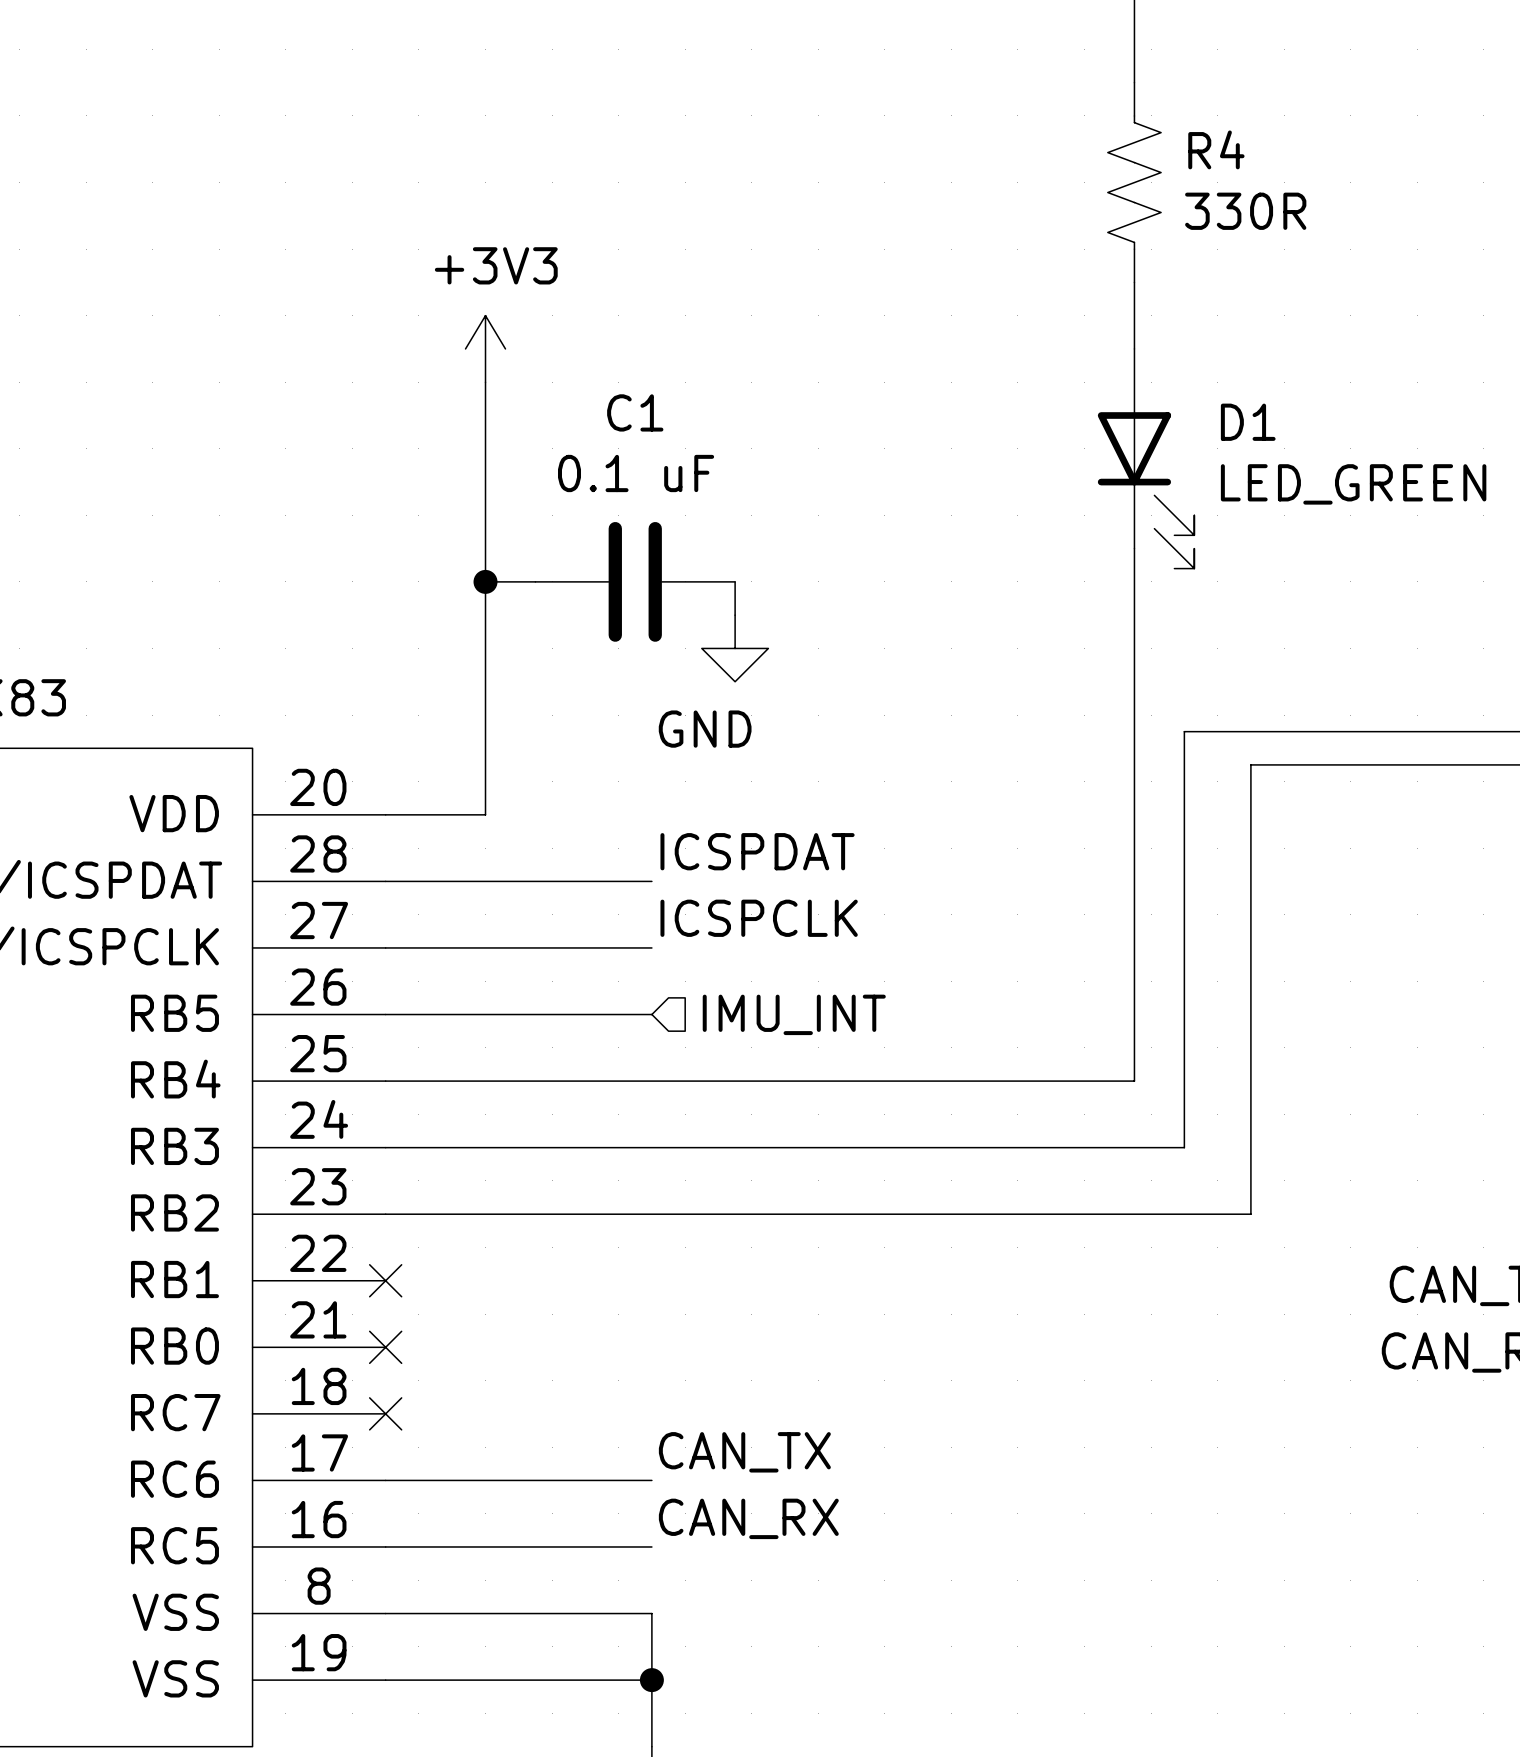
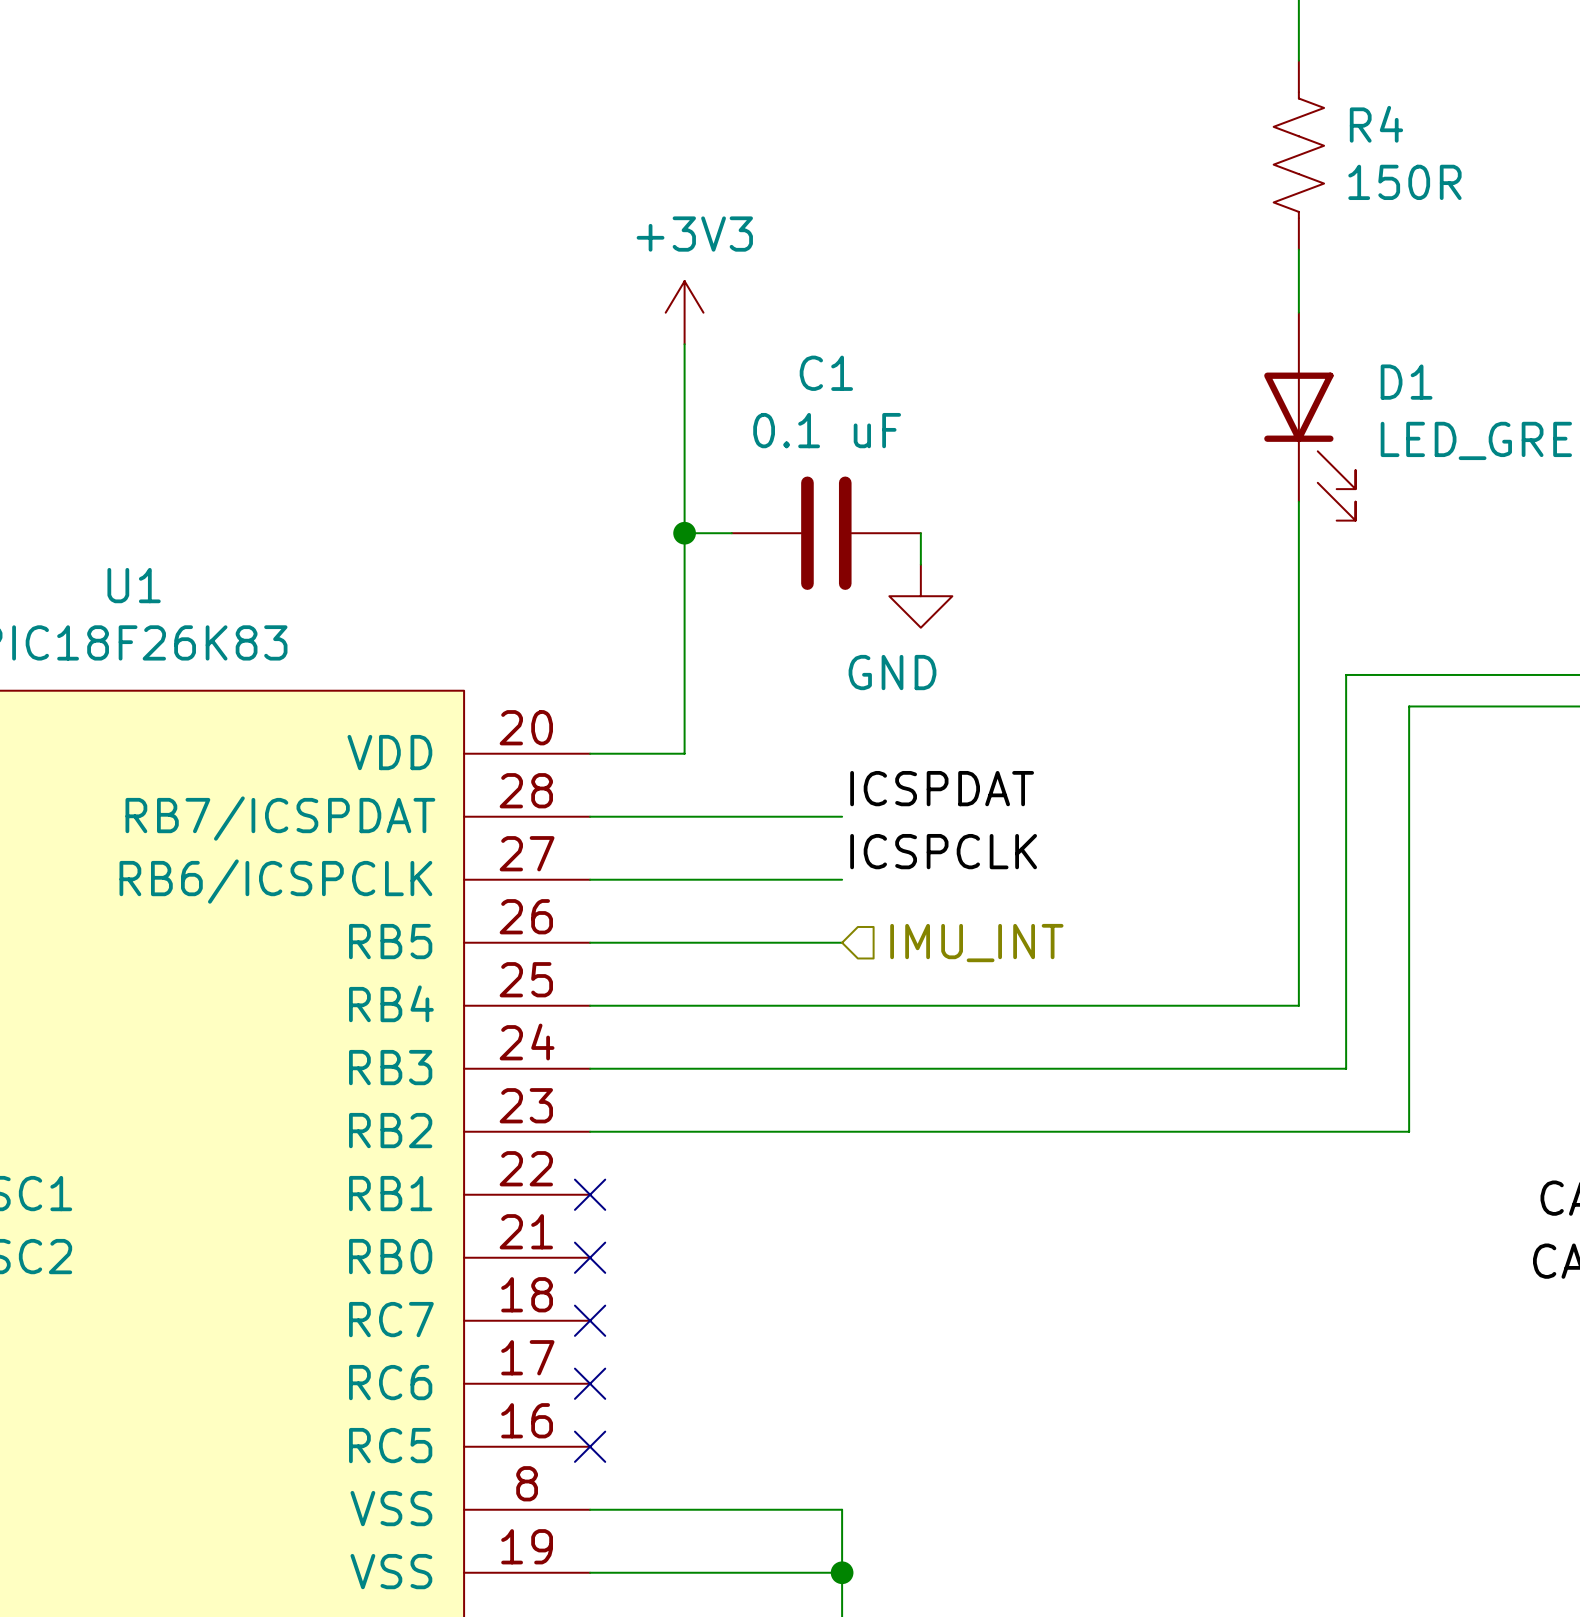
R4 value: 330R (1245, 211) -> 150R (1404, 182)
label: CAN_TX (744, 1452) -> none
wire: (385, 1480) (651, 1480) -> none
no-connect mark: none -> (590, 1383)
label: CAN_RX (748, 1518) -> none
wire: (385, 1546) (651, 1546) -> none
no-connect mark: none -> (590, 1446)

